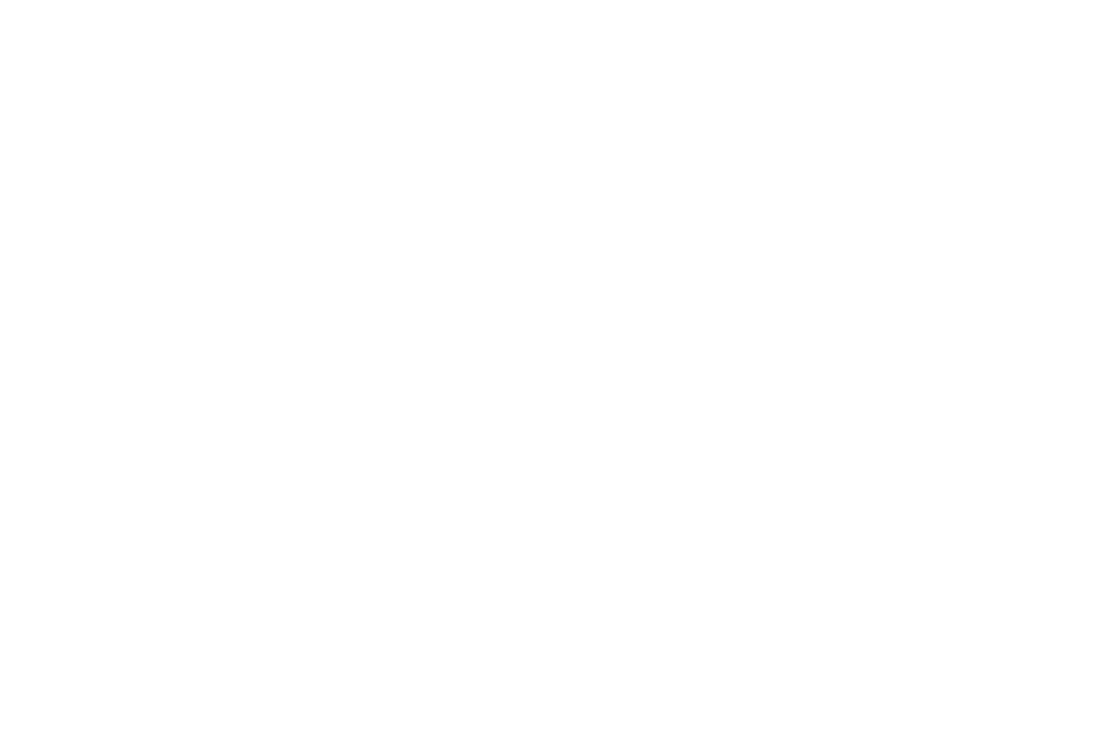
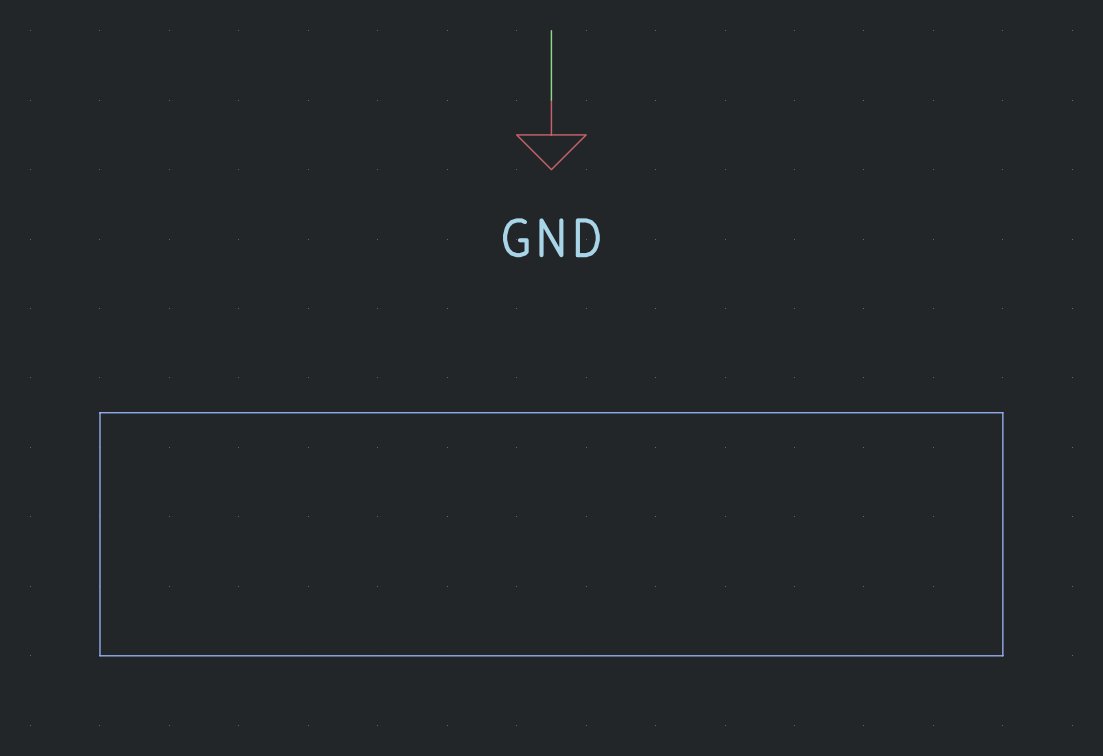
wire: none -> (551, 30) (551, 100)
power symbol: none -> GND (551, 134)
line: none -> (99, 412) (1002, 412) (1002, 655) (99, 655) (99, 412)

